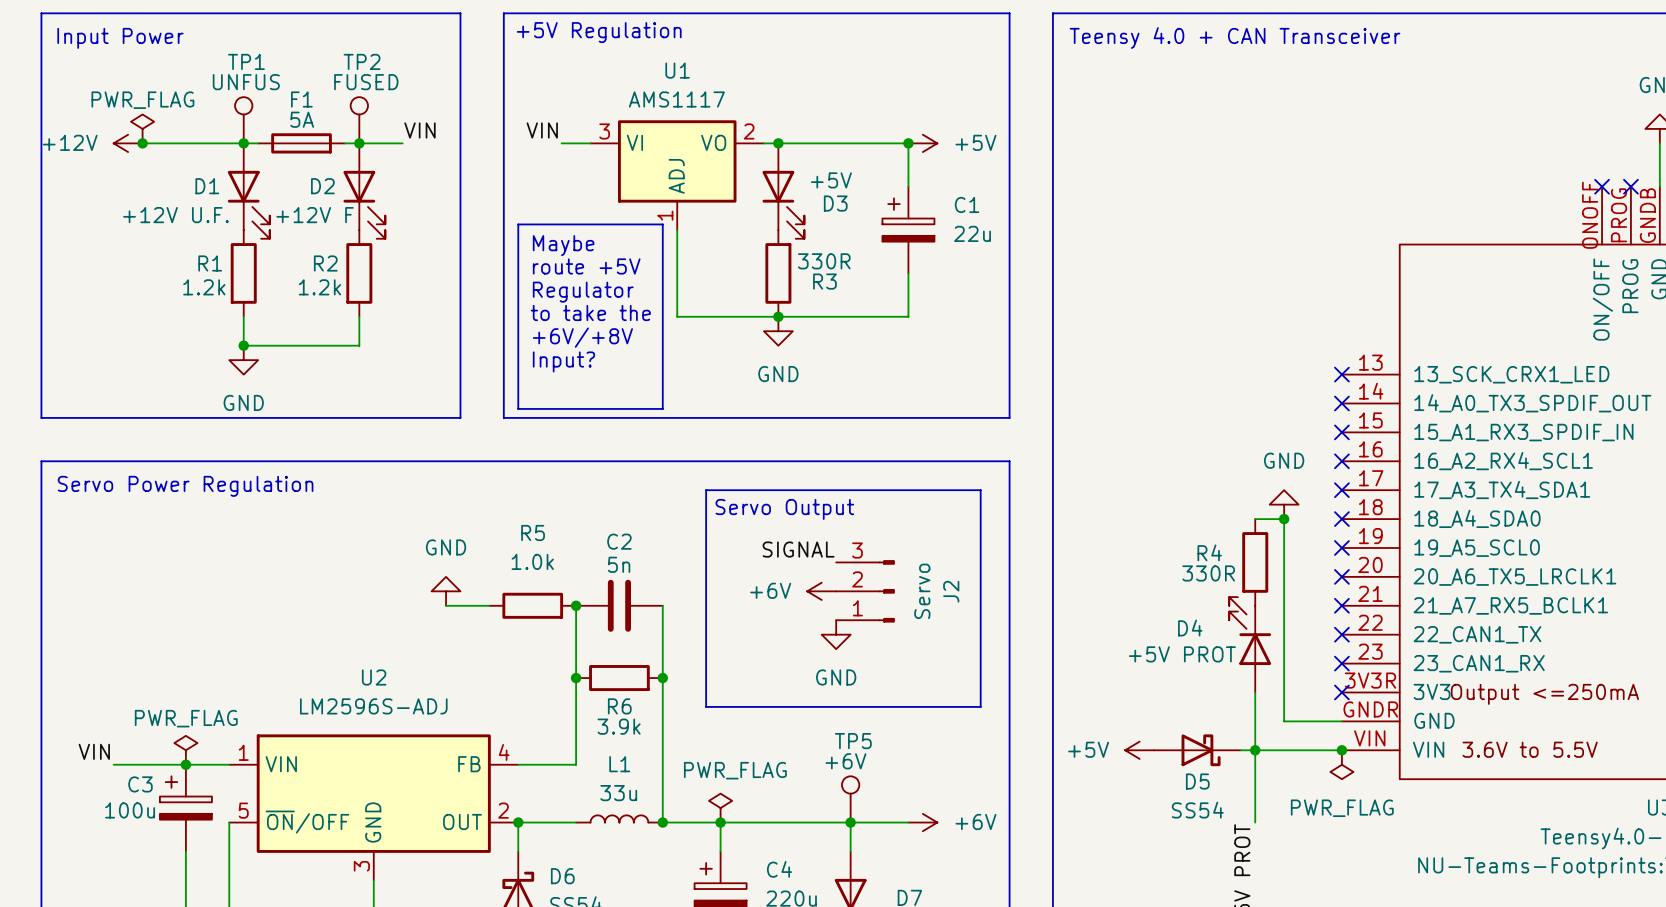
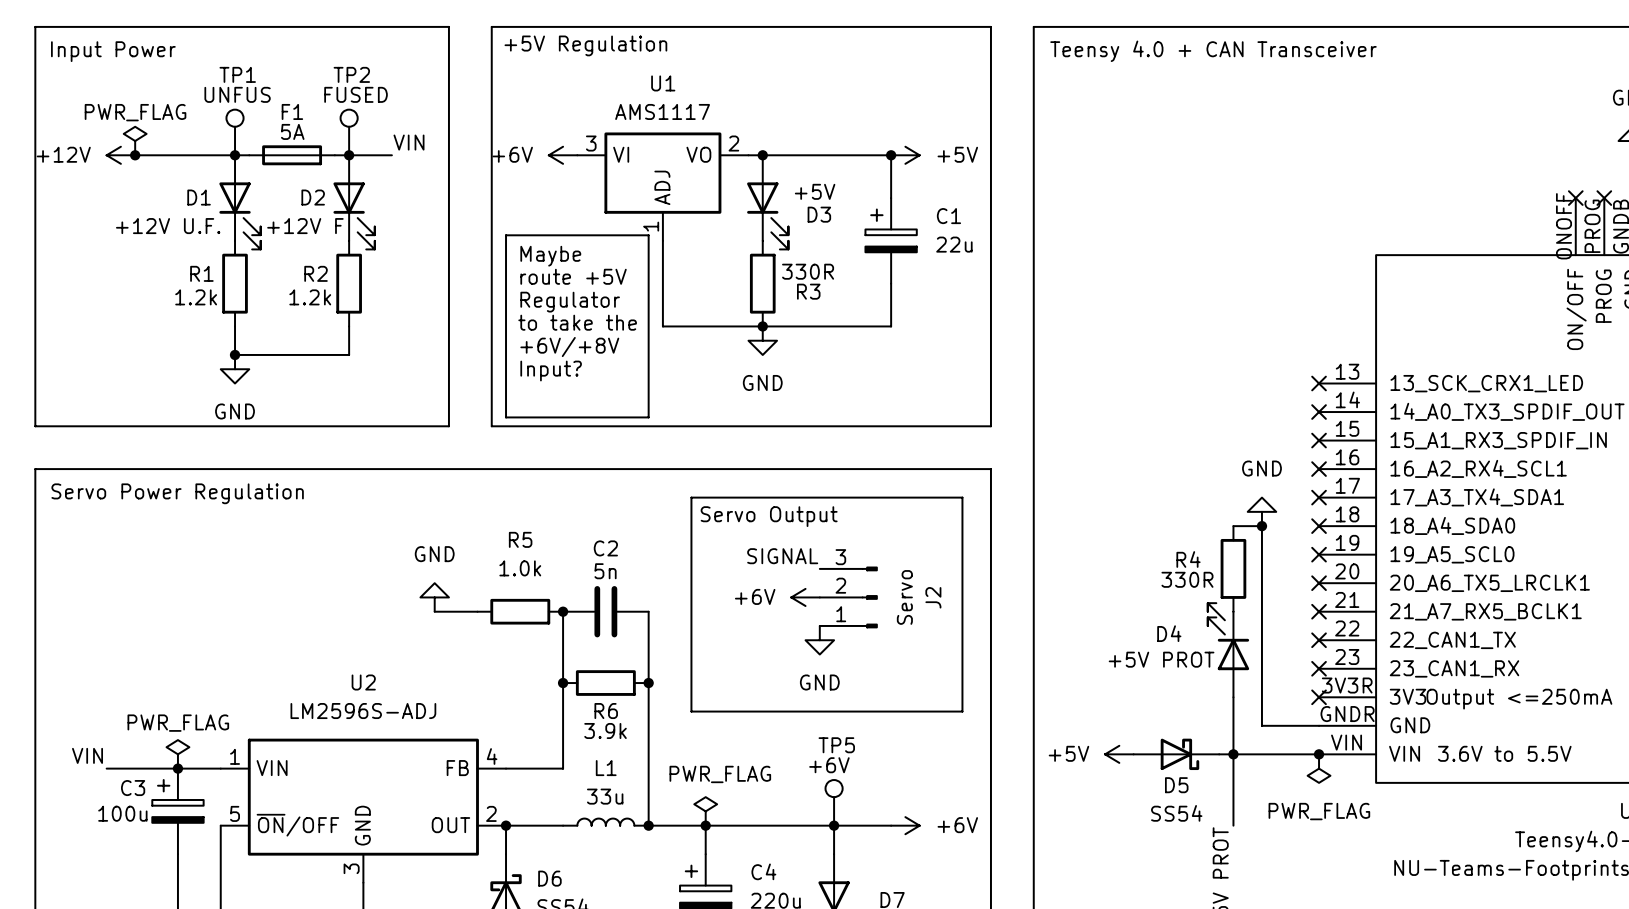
label: VIN (542, 130) -> none
power symbol: none -> +6V (563, 155)

